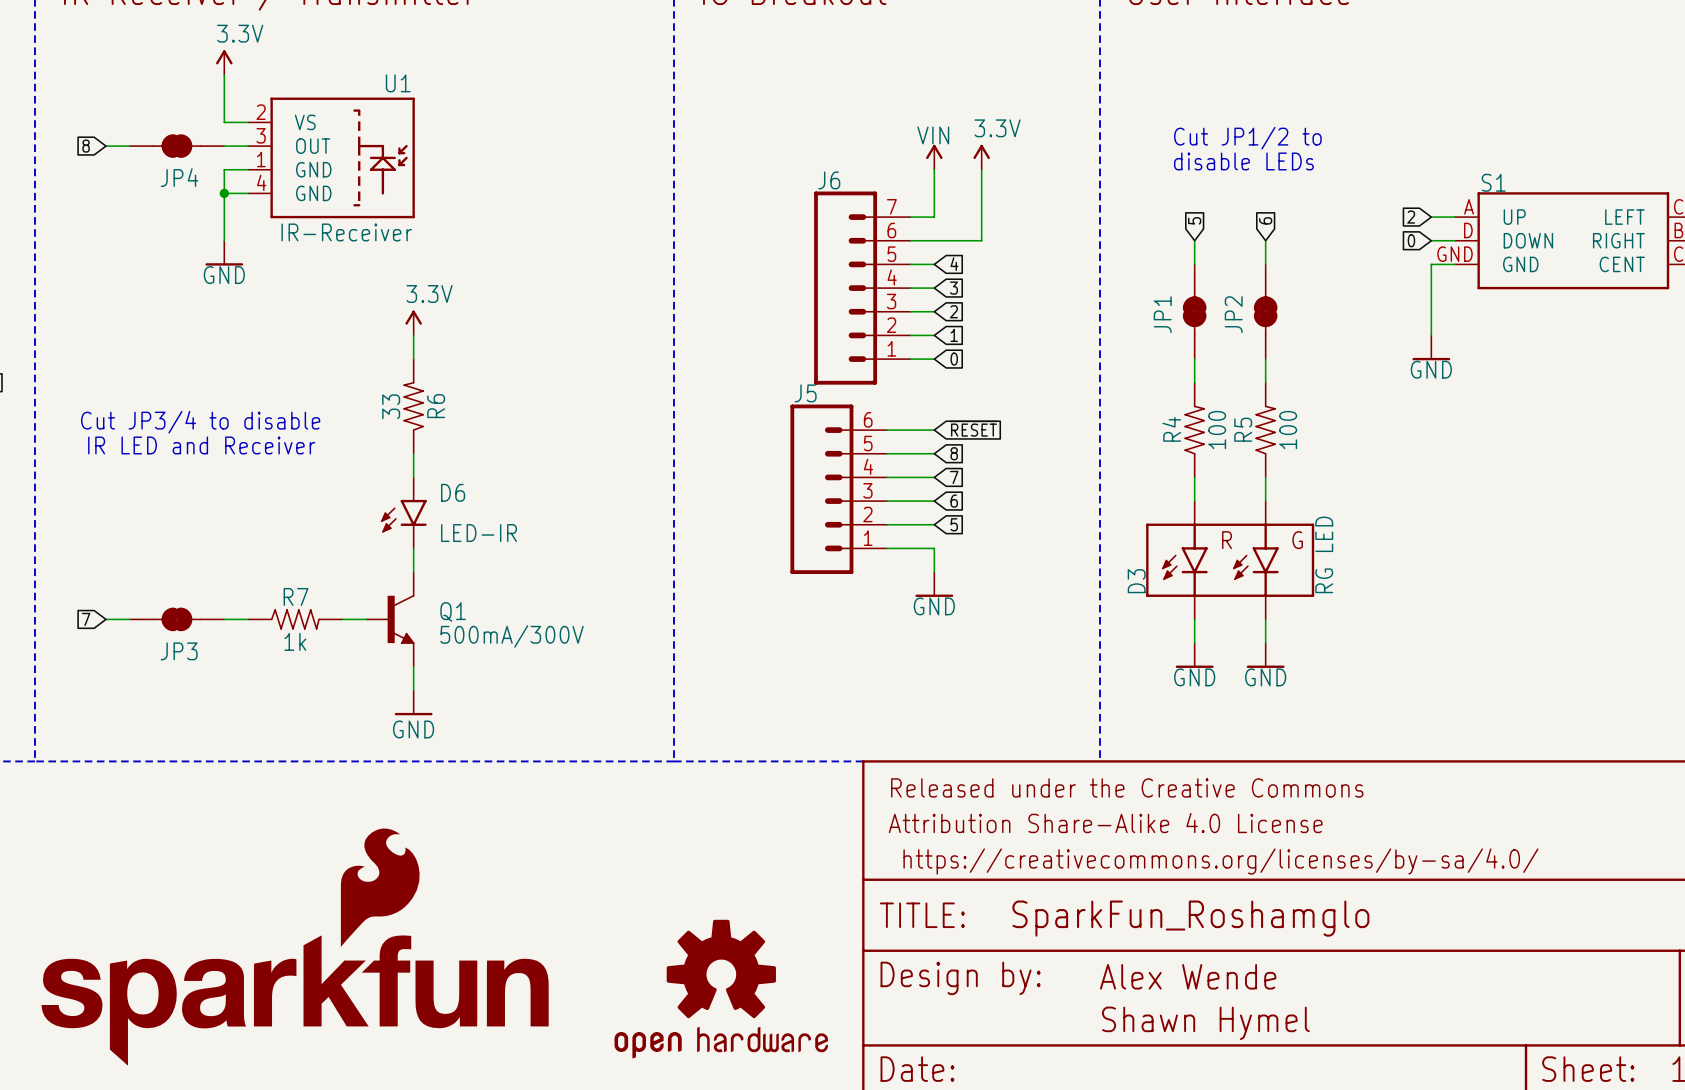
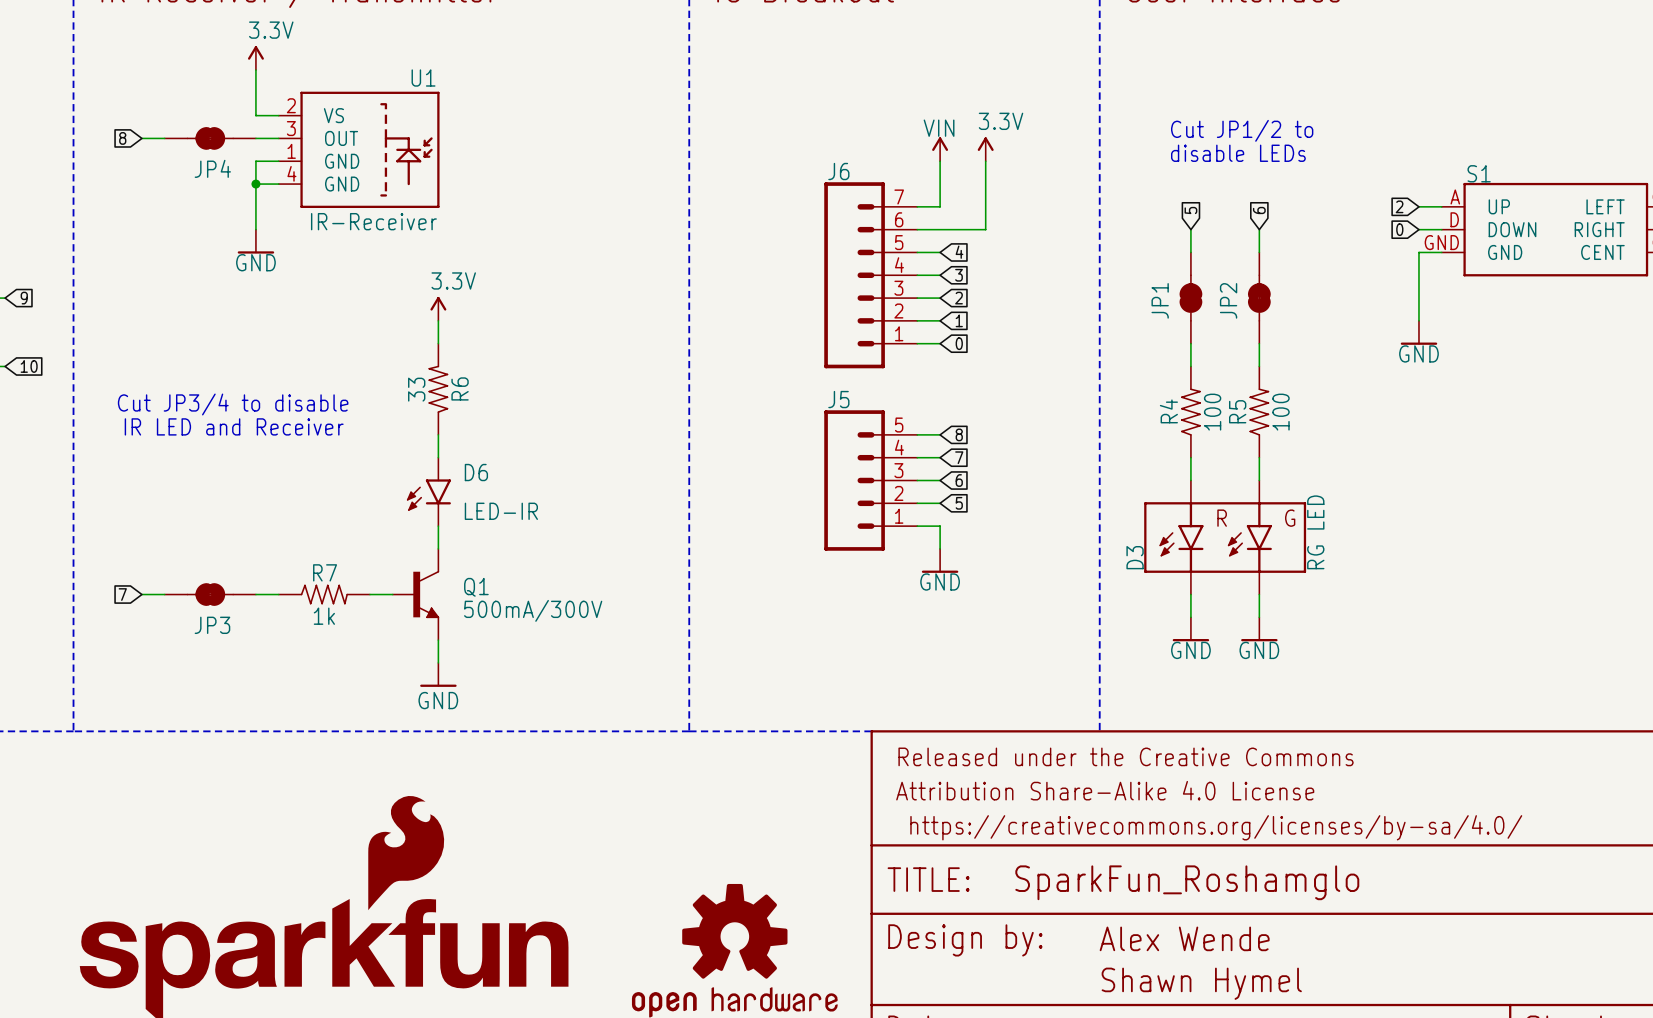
J5 symbol: [790, 404, 887, 574] -> [824, 410, 918, 551]
global label: ~{RESET} (973, 428) -> none
wire: (886, 430) (934, 430) -> none

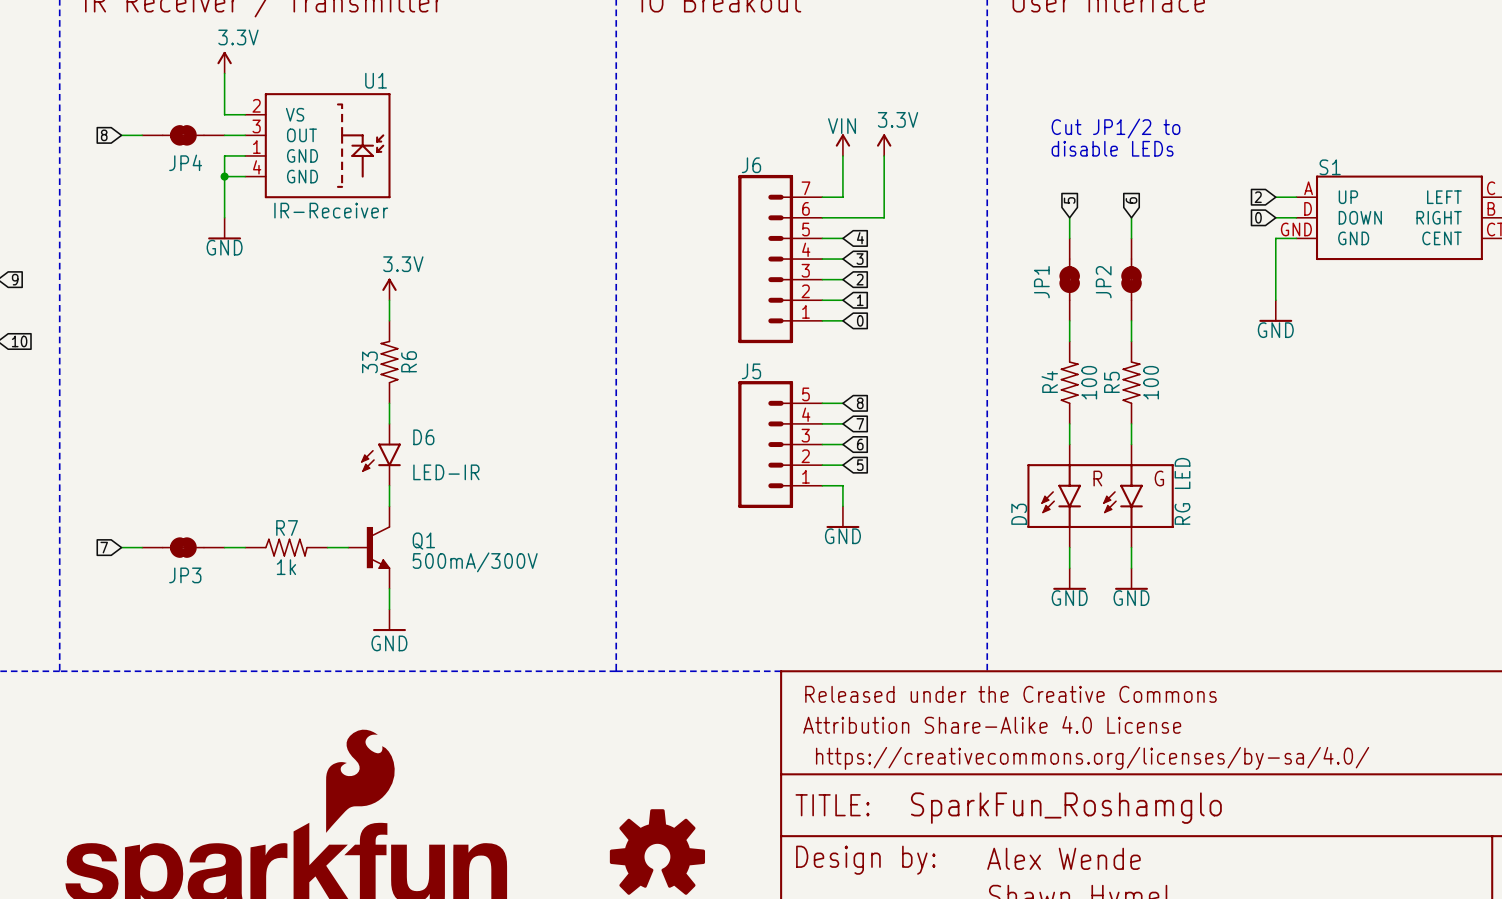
text: Cut JP3/4 to disable (233, 404) -> none
text: IR LED and Receiver (234, 426) -> none

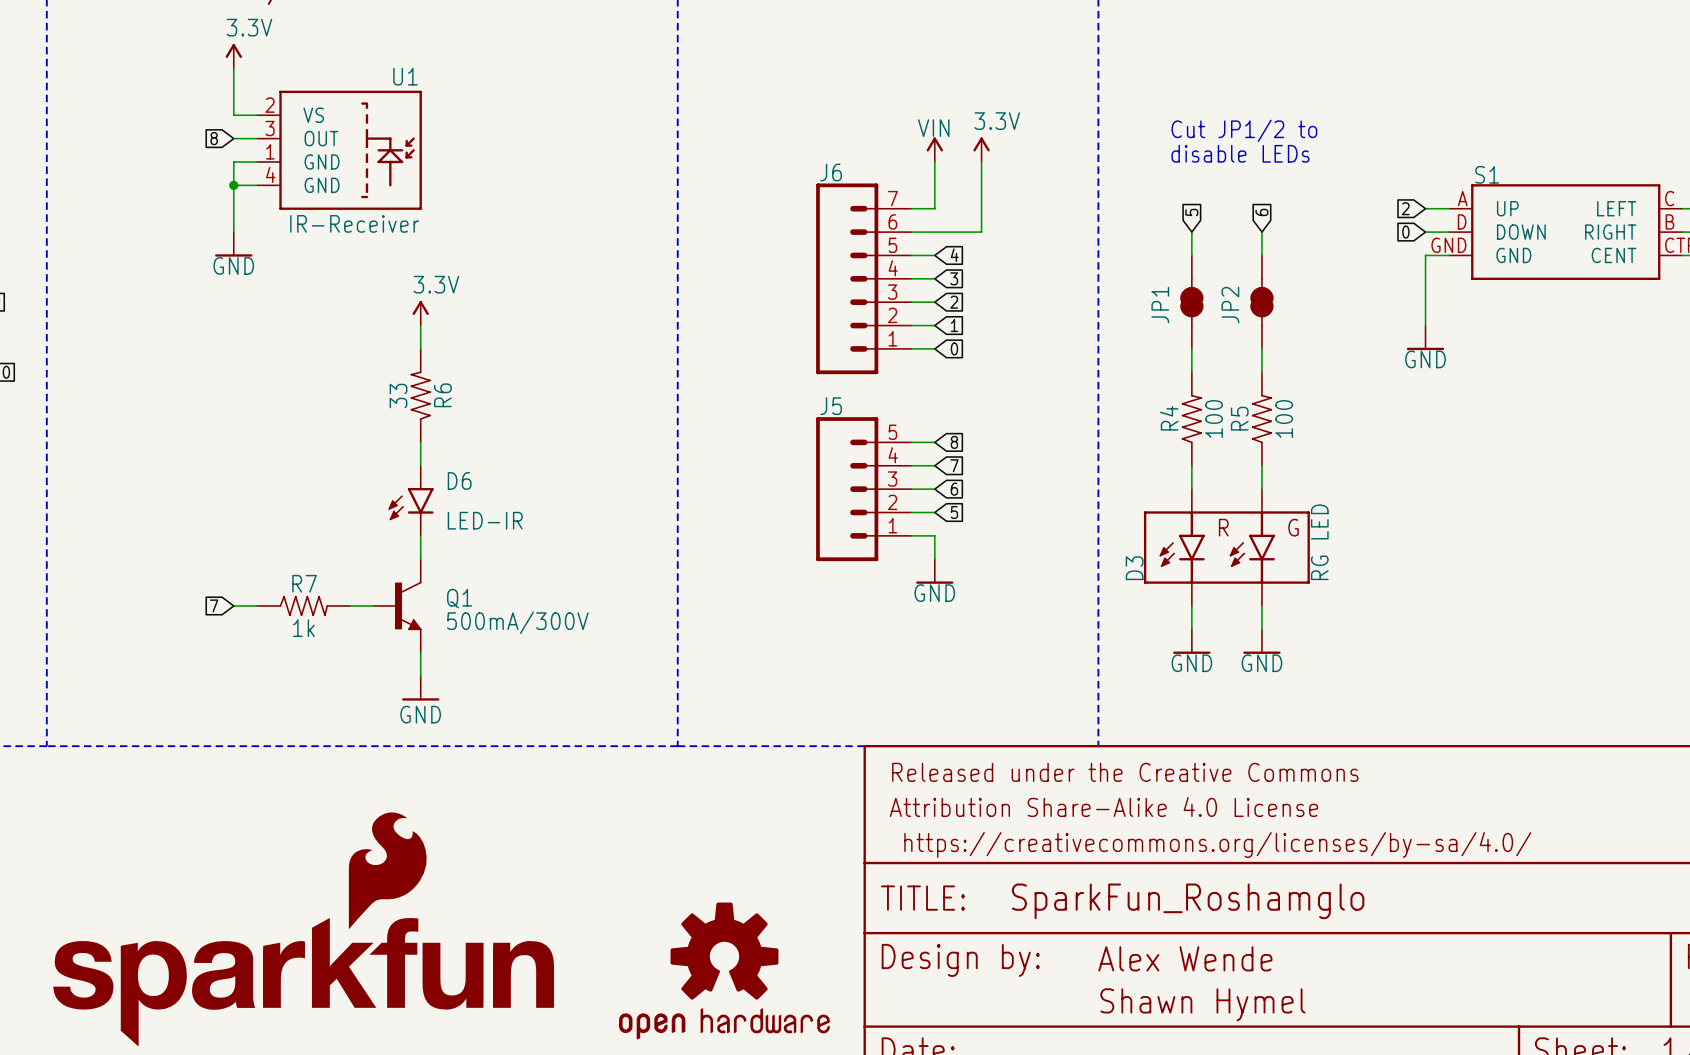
global label position: 8 (104, 135) -> 8 (214, 138)
wire: (121, 135) (142, 135) -> none
JP4: (183, 135) -> none
global label position: 7 (104, 547) -> 7 (214, 605)
wire: (121, 547) (142, 547) -> none
JP3: (183, 547) -> none

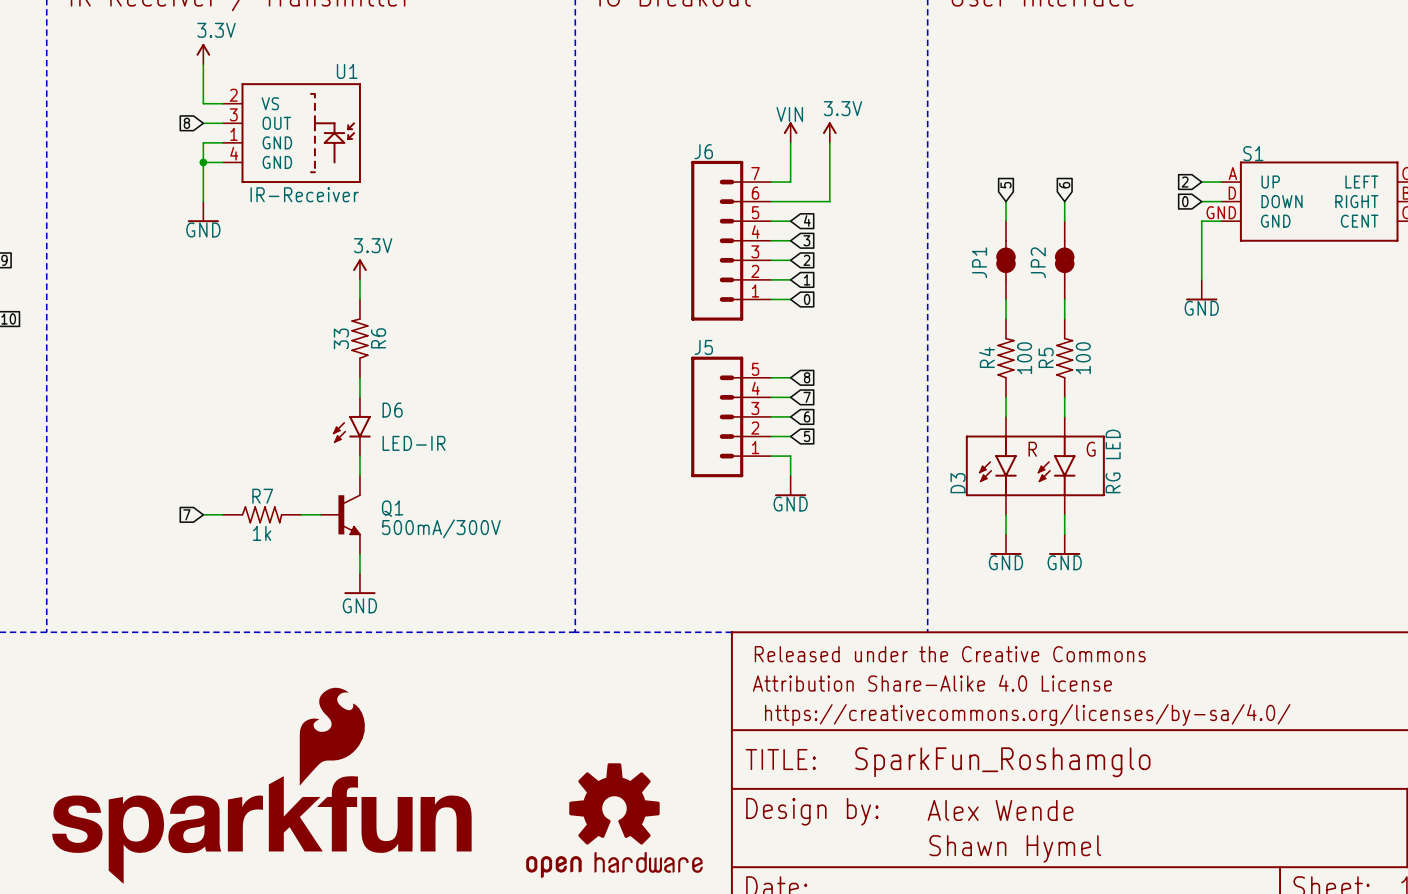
text: Cut JP1/2 to (1244, 130) -> none
text: disable LEDs (1240, 153) -> none

